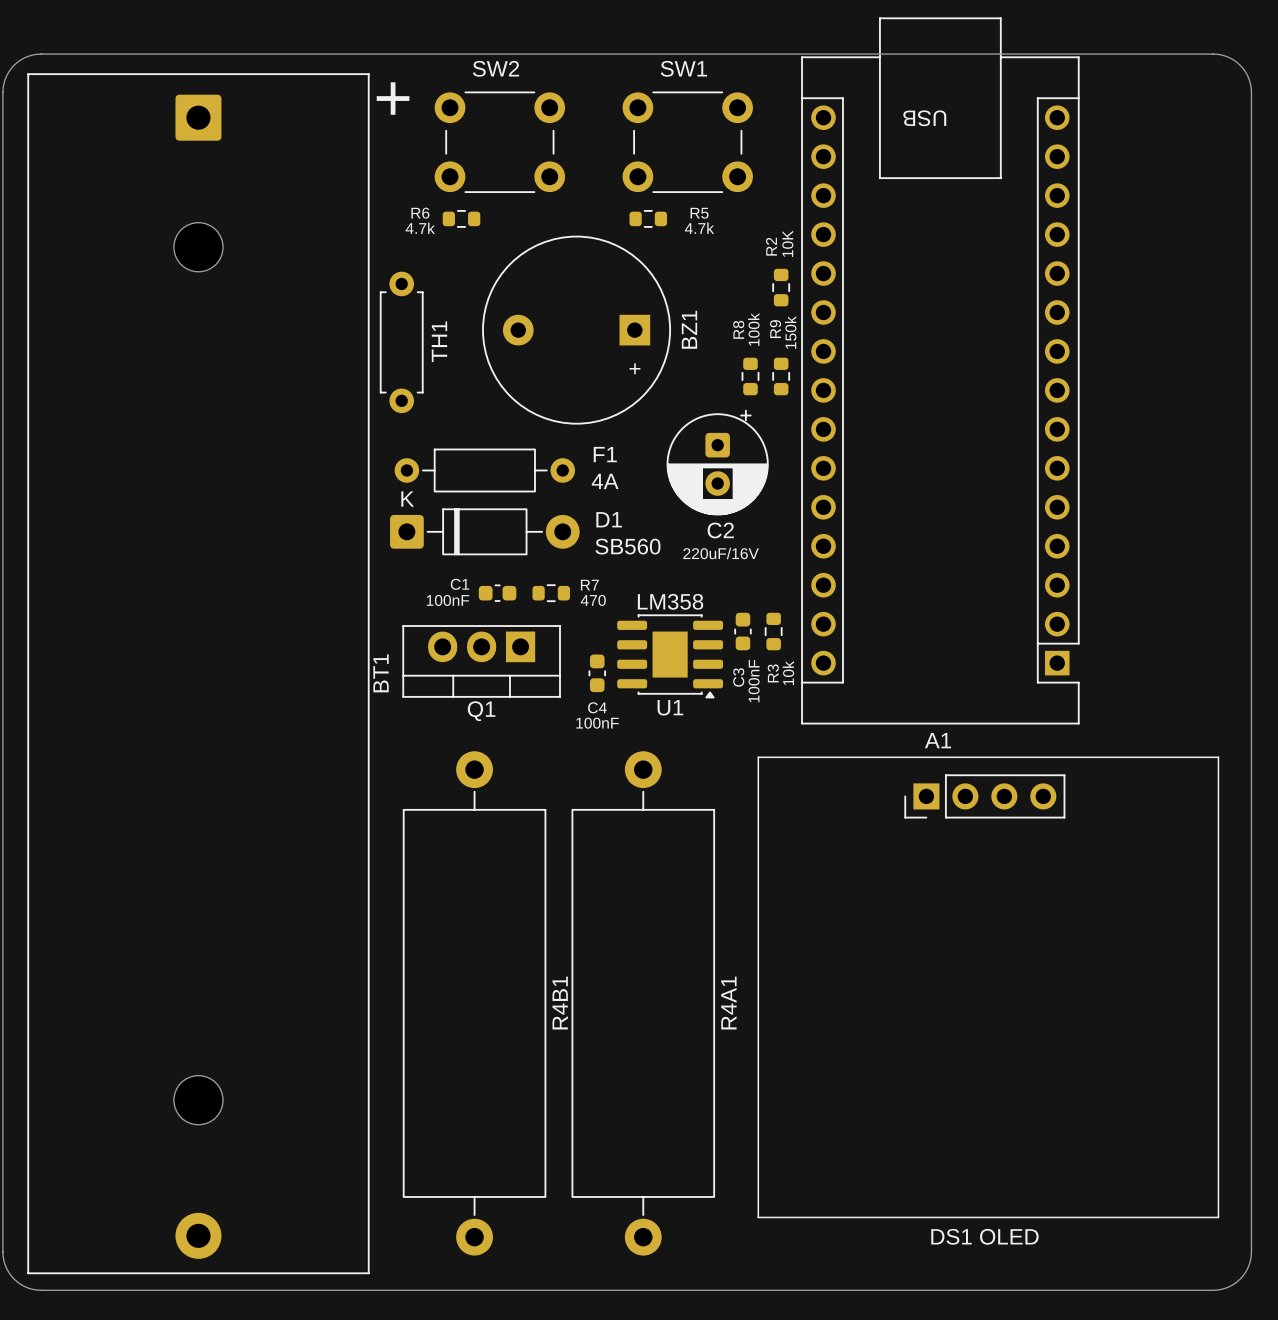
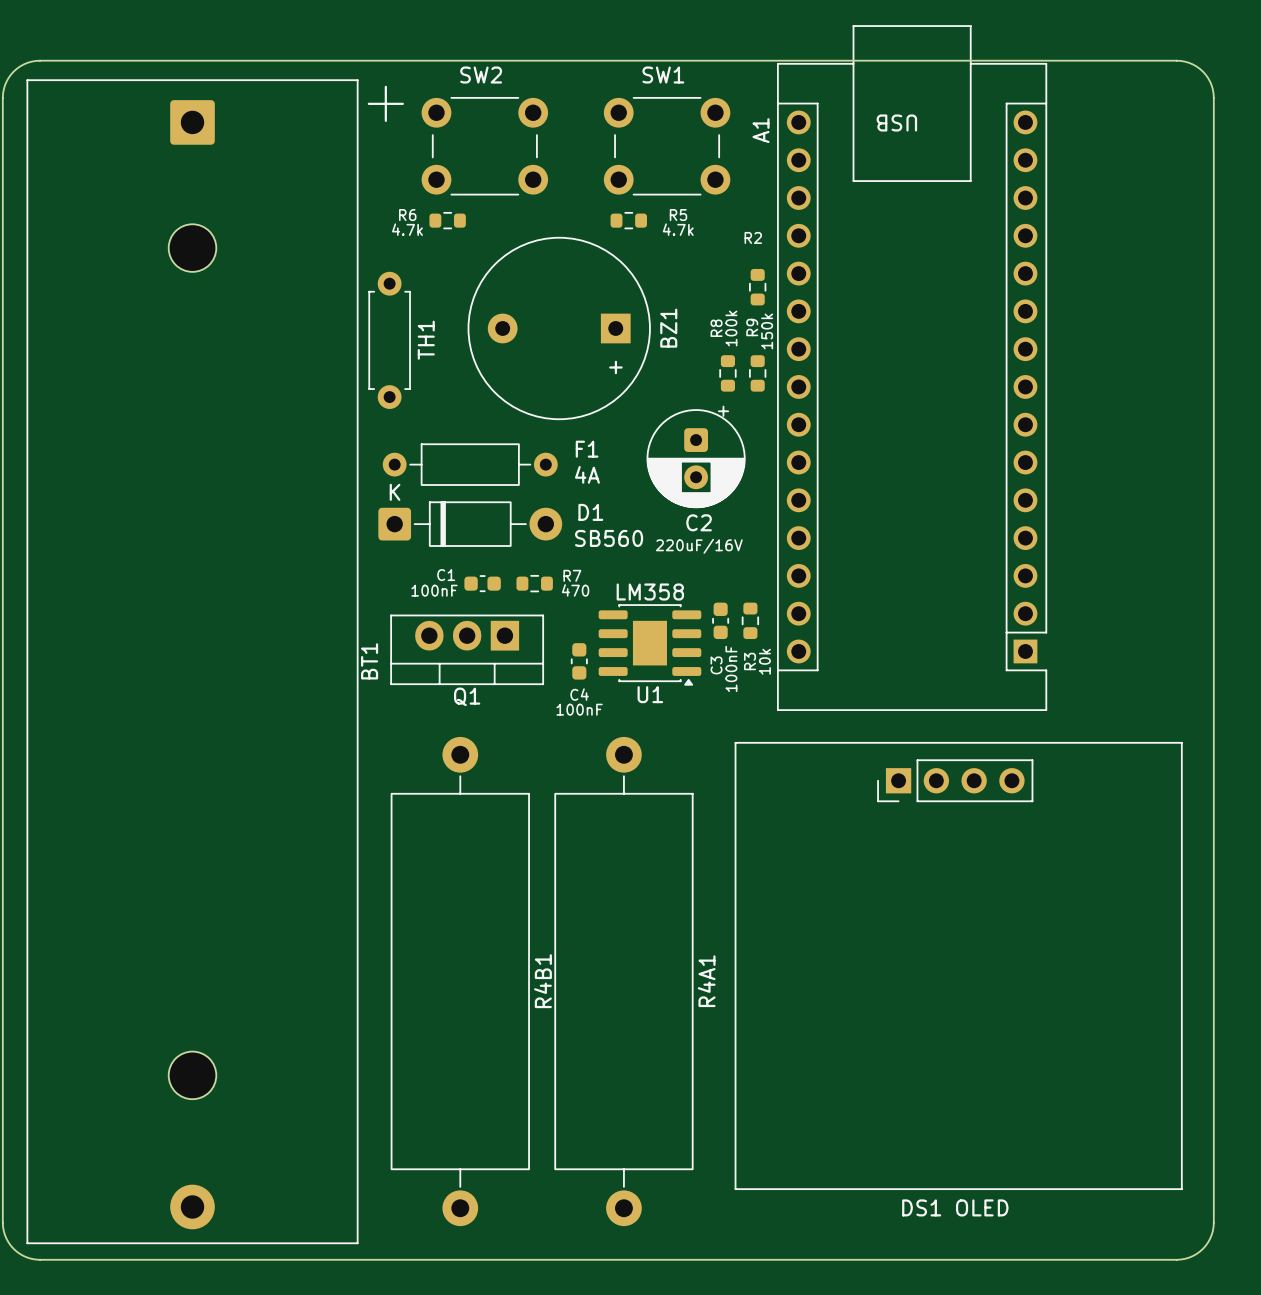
R2 value: 10K (787, 243) -> none
R2 name rotation: 0° (771, 246) -> 90° clockwise (753, 237)
A1 name rotation: 0° (938, 740) -> 90° counterclockwise (761, 130)
A1 name position: A1 (938, 740) -> A1 (761, 130)

